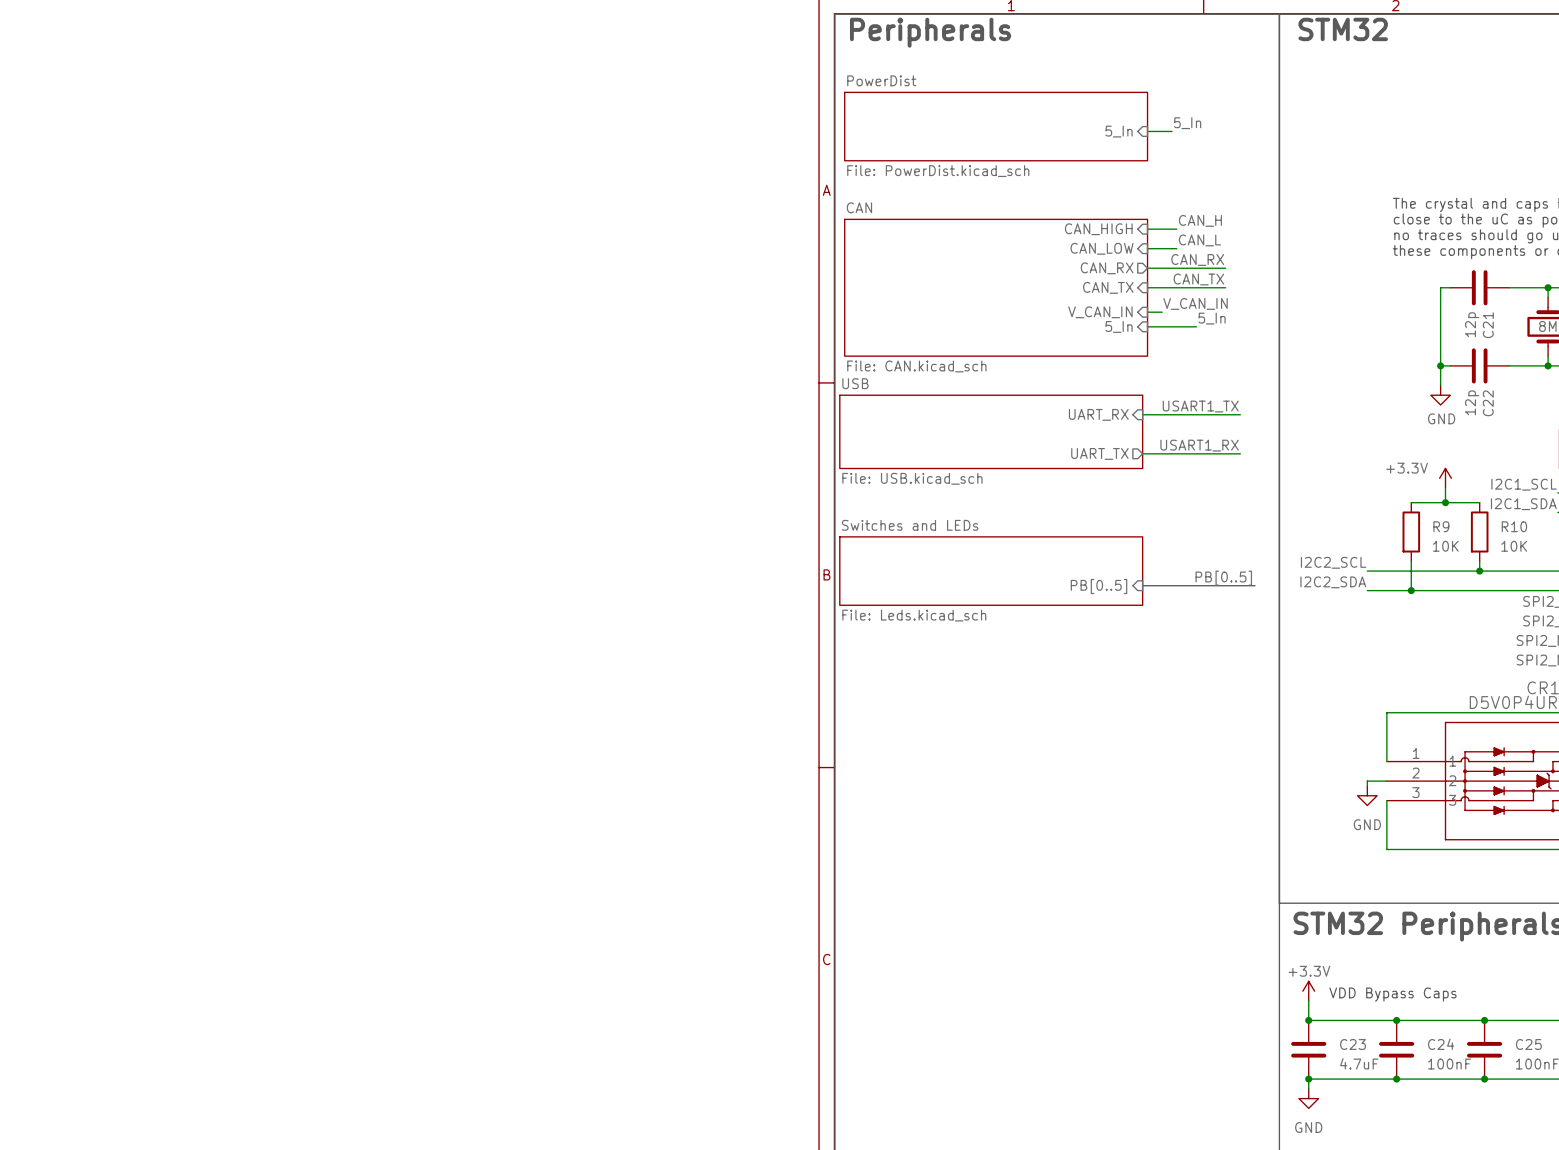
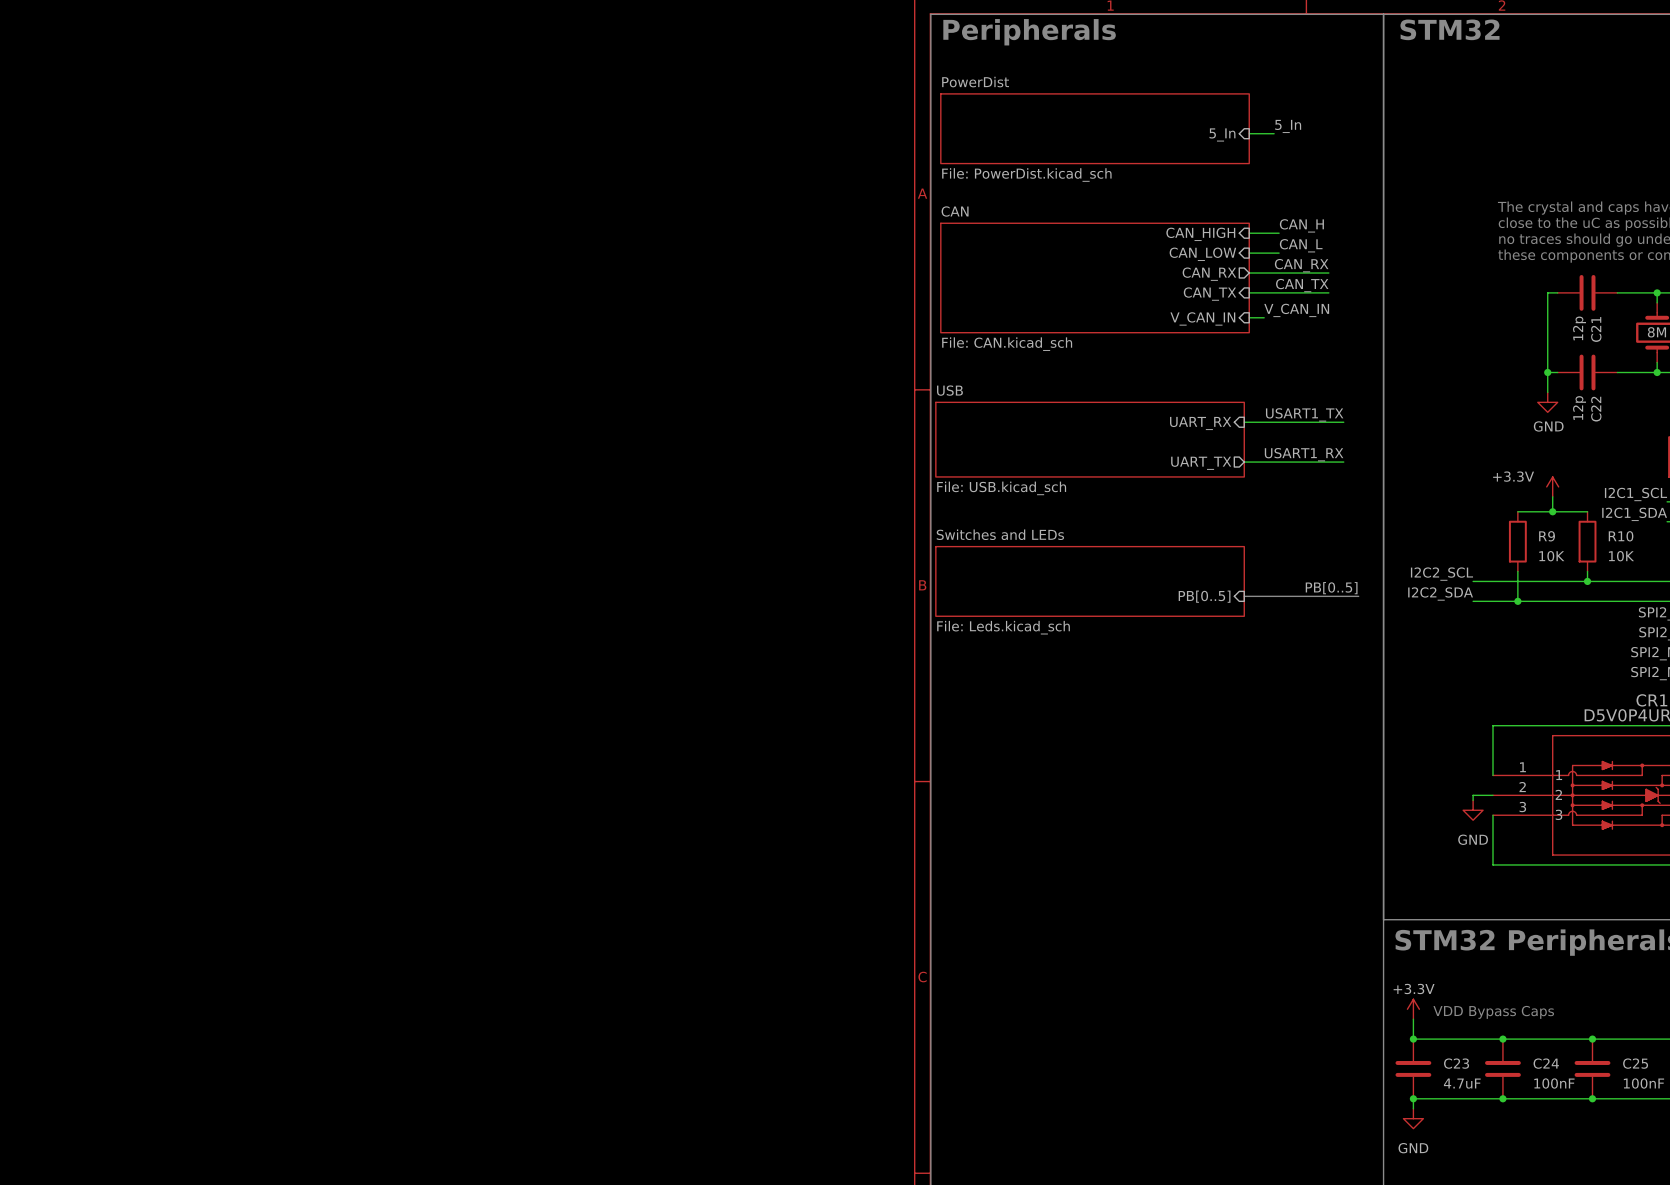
sheet CAN: none -> File: CAN.kicad_sch (1095, 277)
sheet CAN: File: CAN.kicad_sch (996, 287) -> none
label: 5_In (1212, 318) -> none
sheet pin: 5_In (1119, 326) -> none
wire: (1147, 326) (1196, 326) -> none

